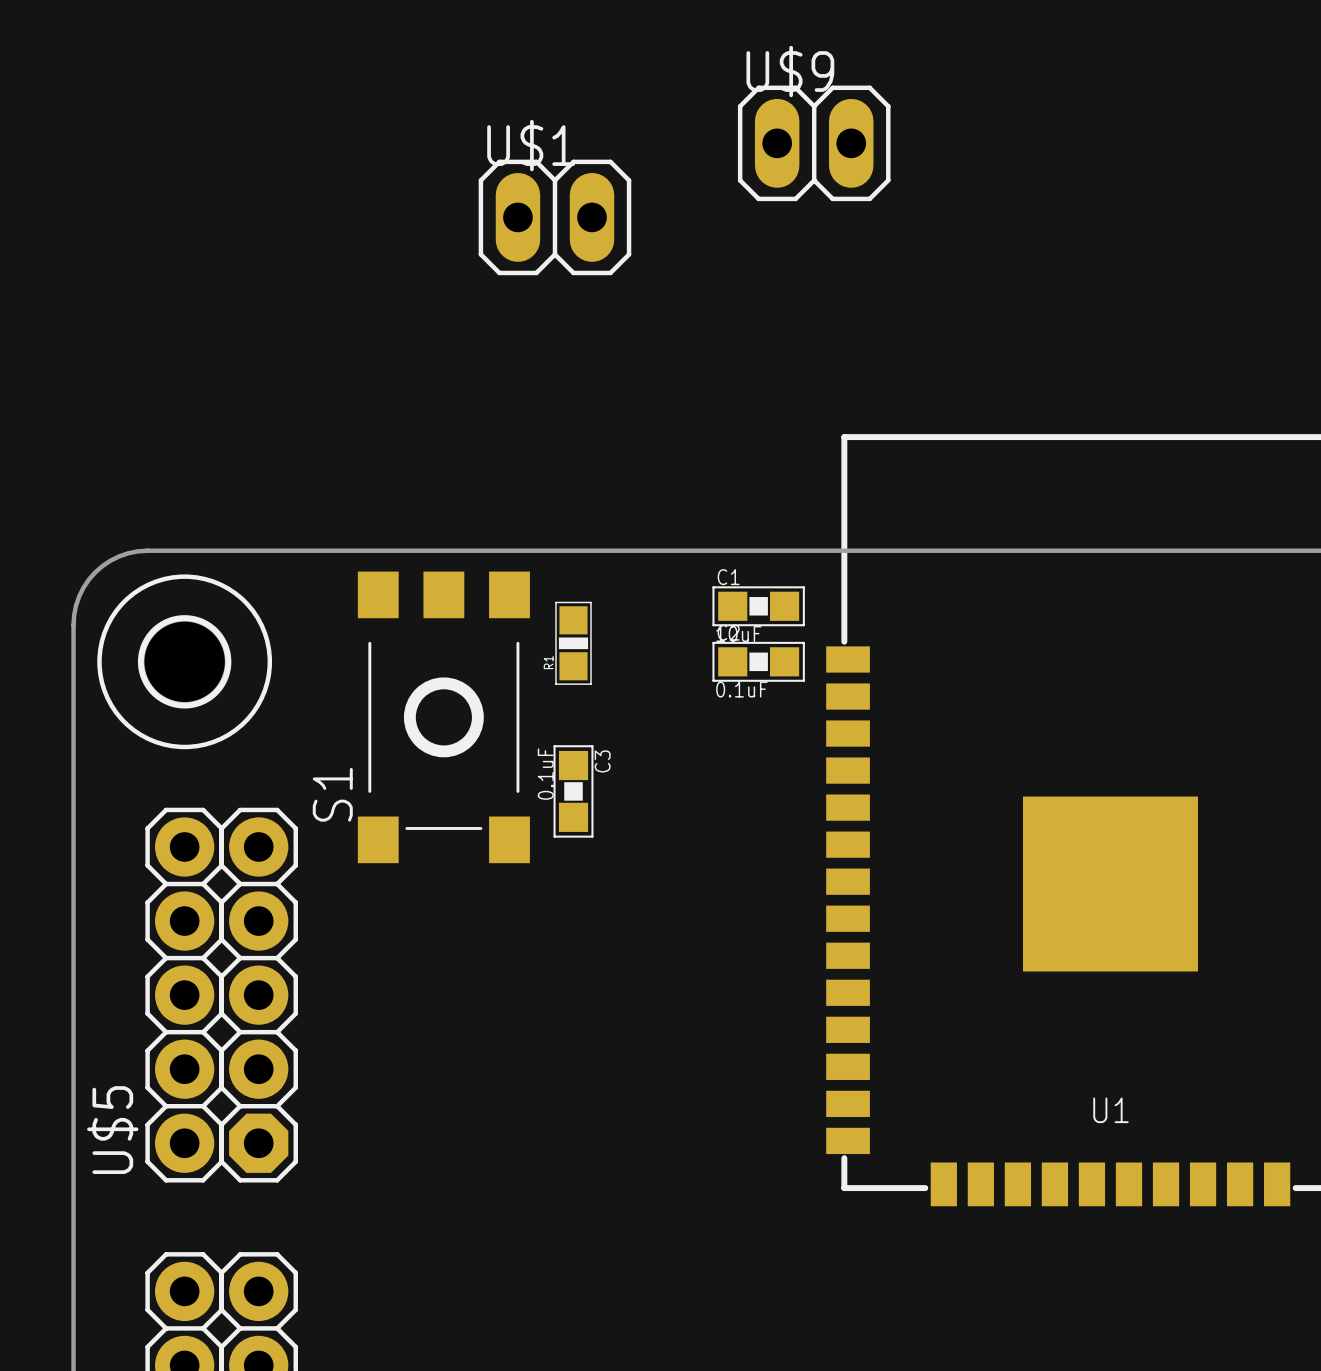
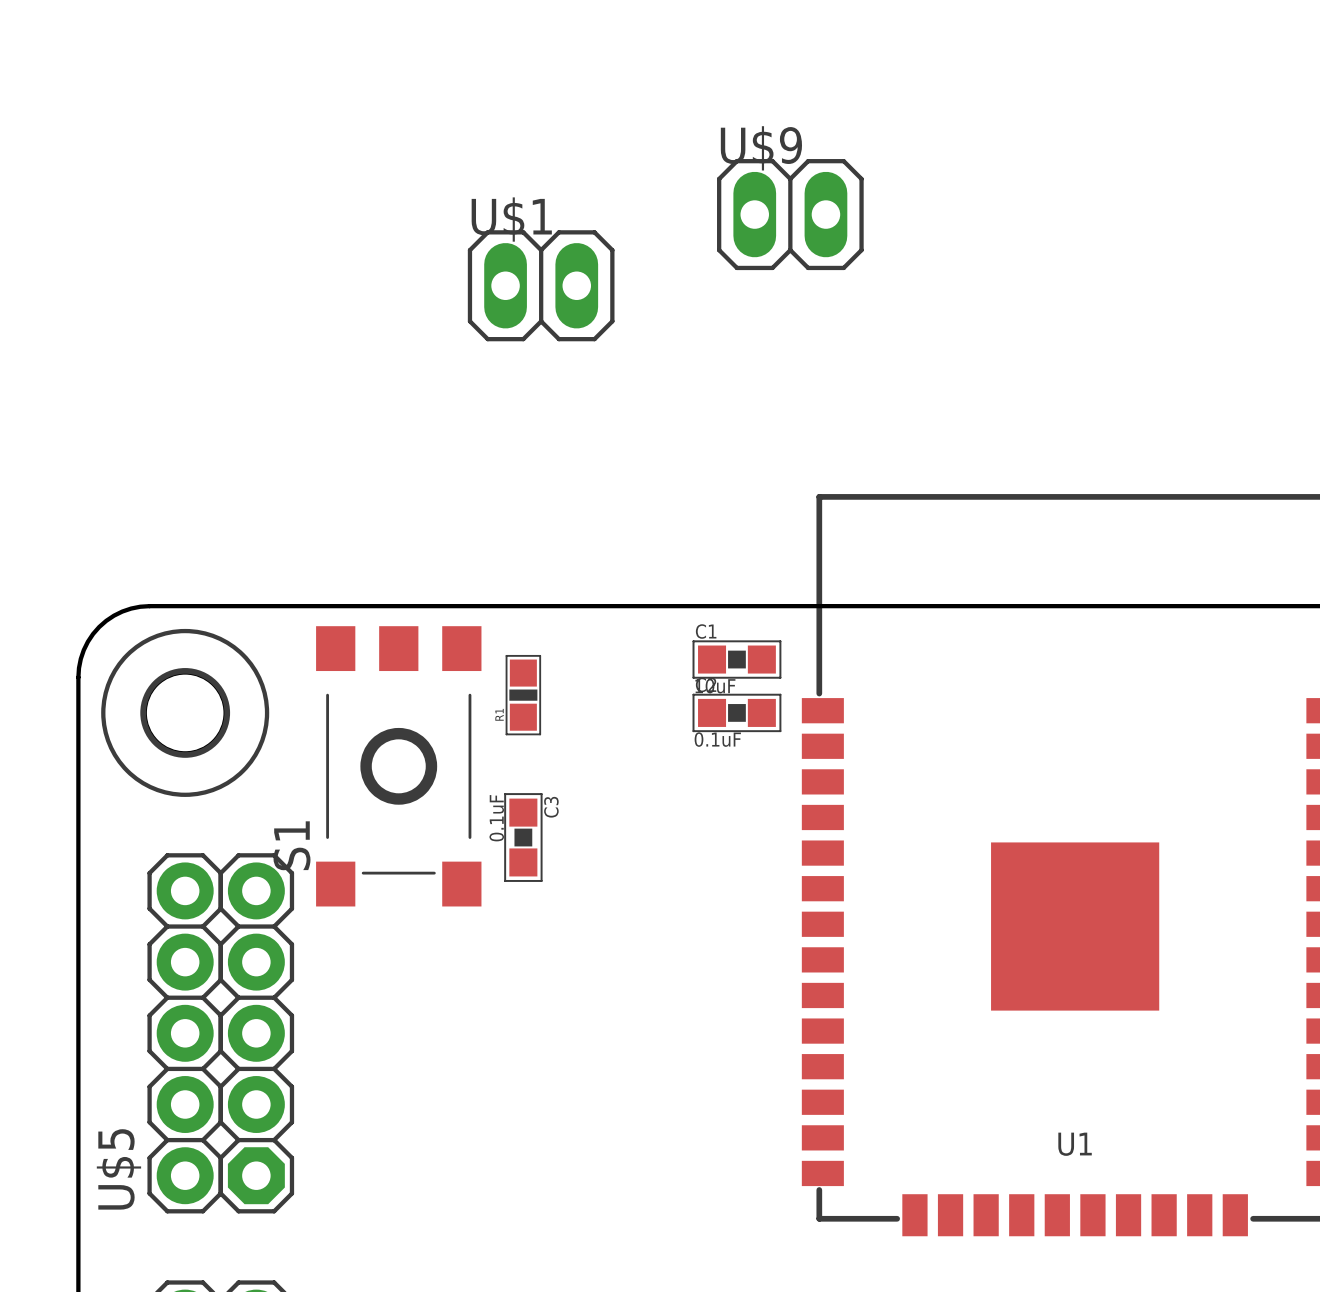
R1 position: (573, 643) -> (523, 695)
S1 position: (443, 717) -> (398, 766)
C3 position: (573, 791) -> (523, 837)

